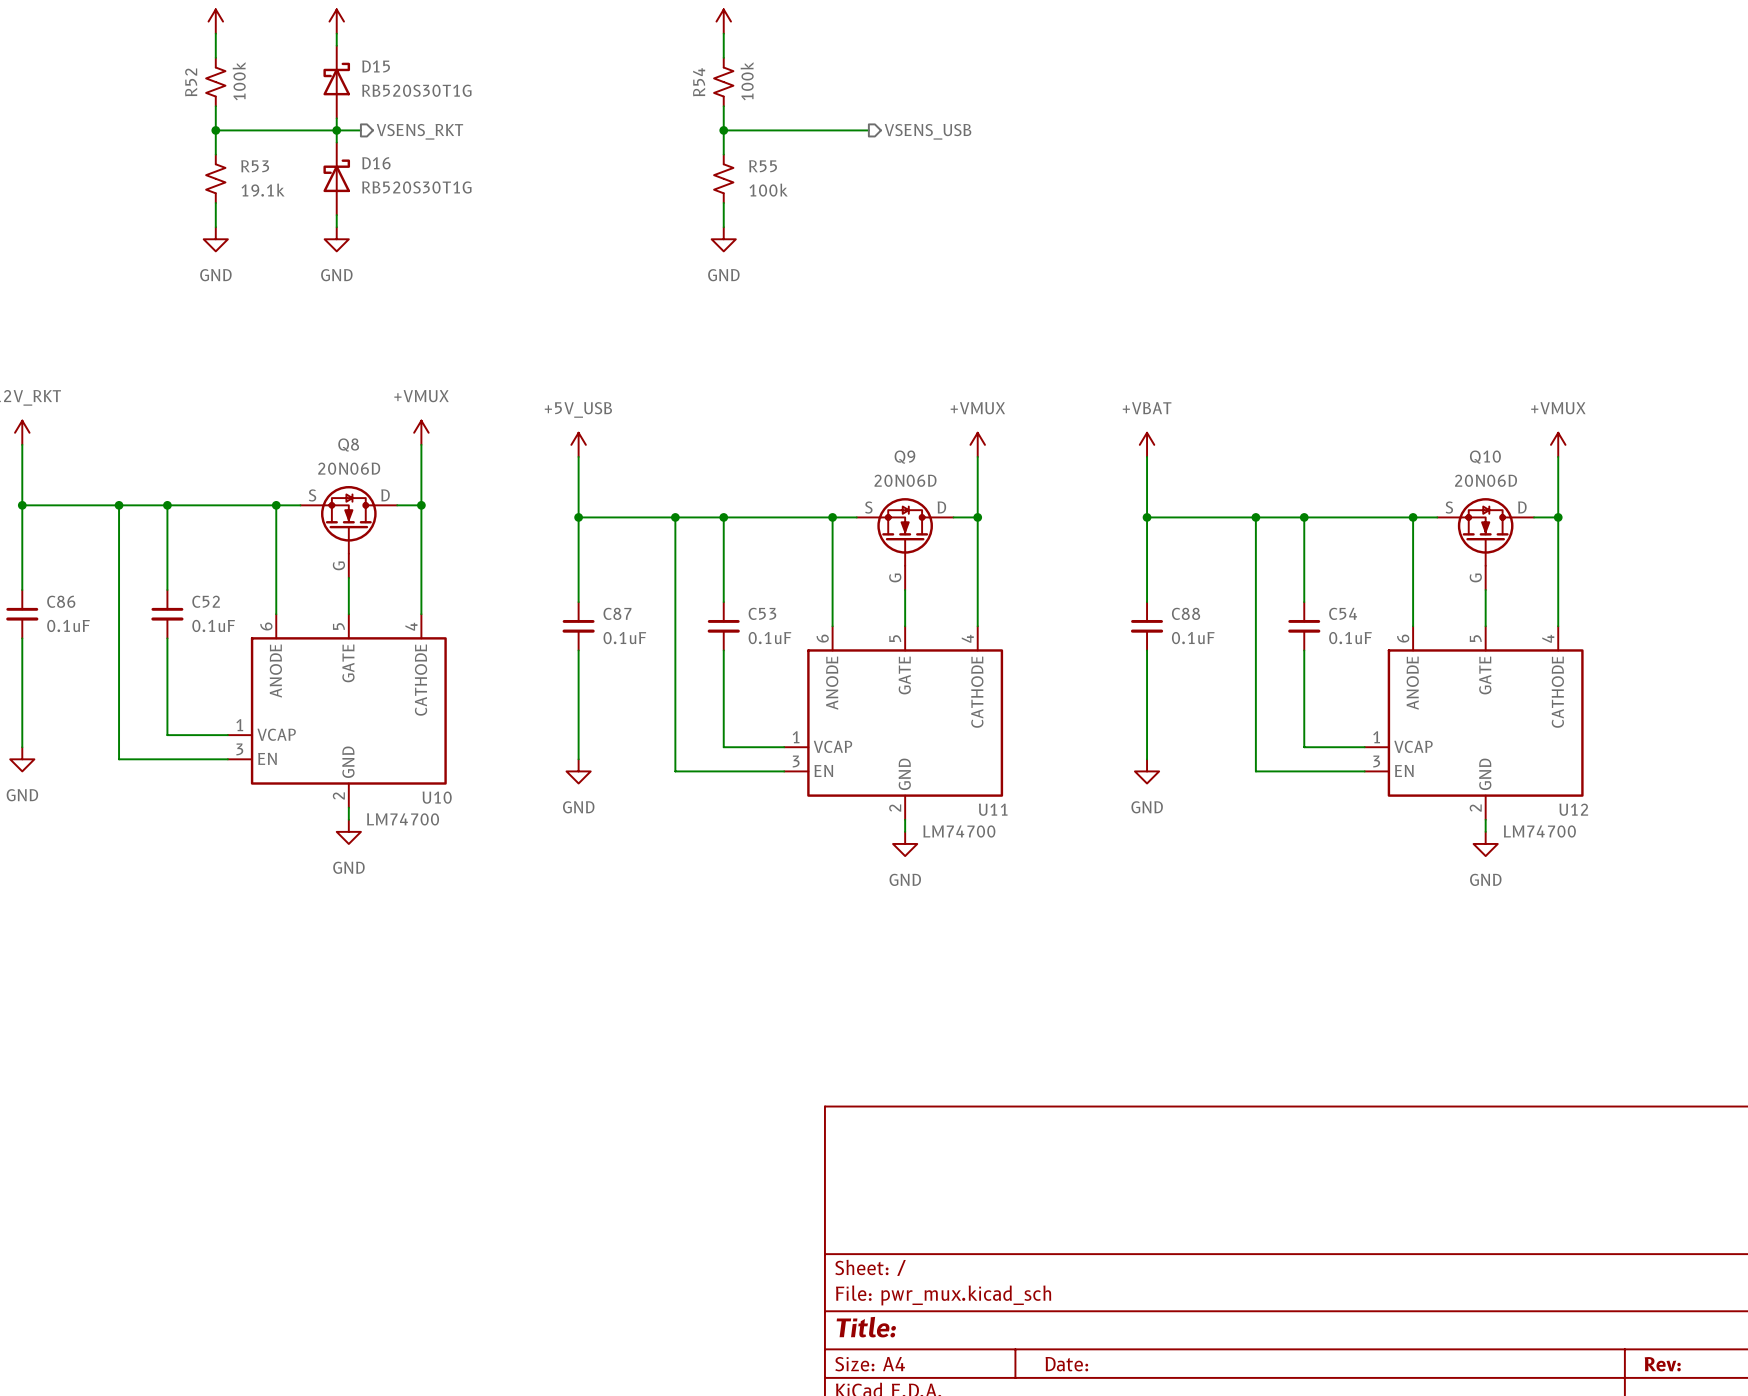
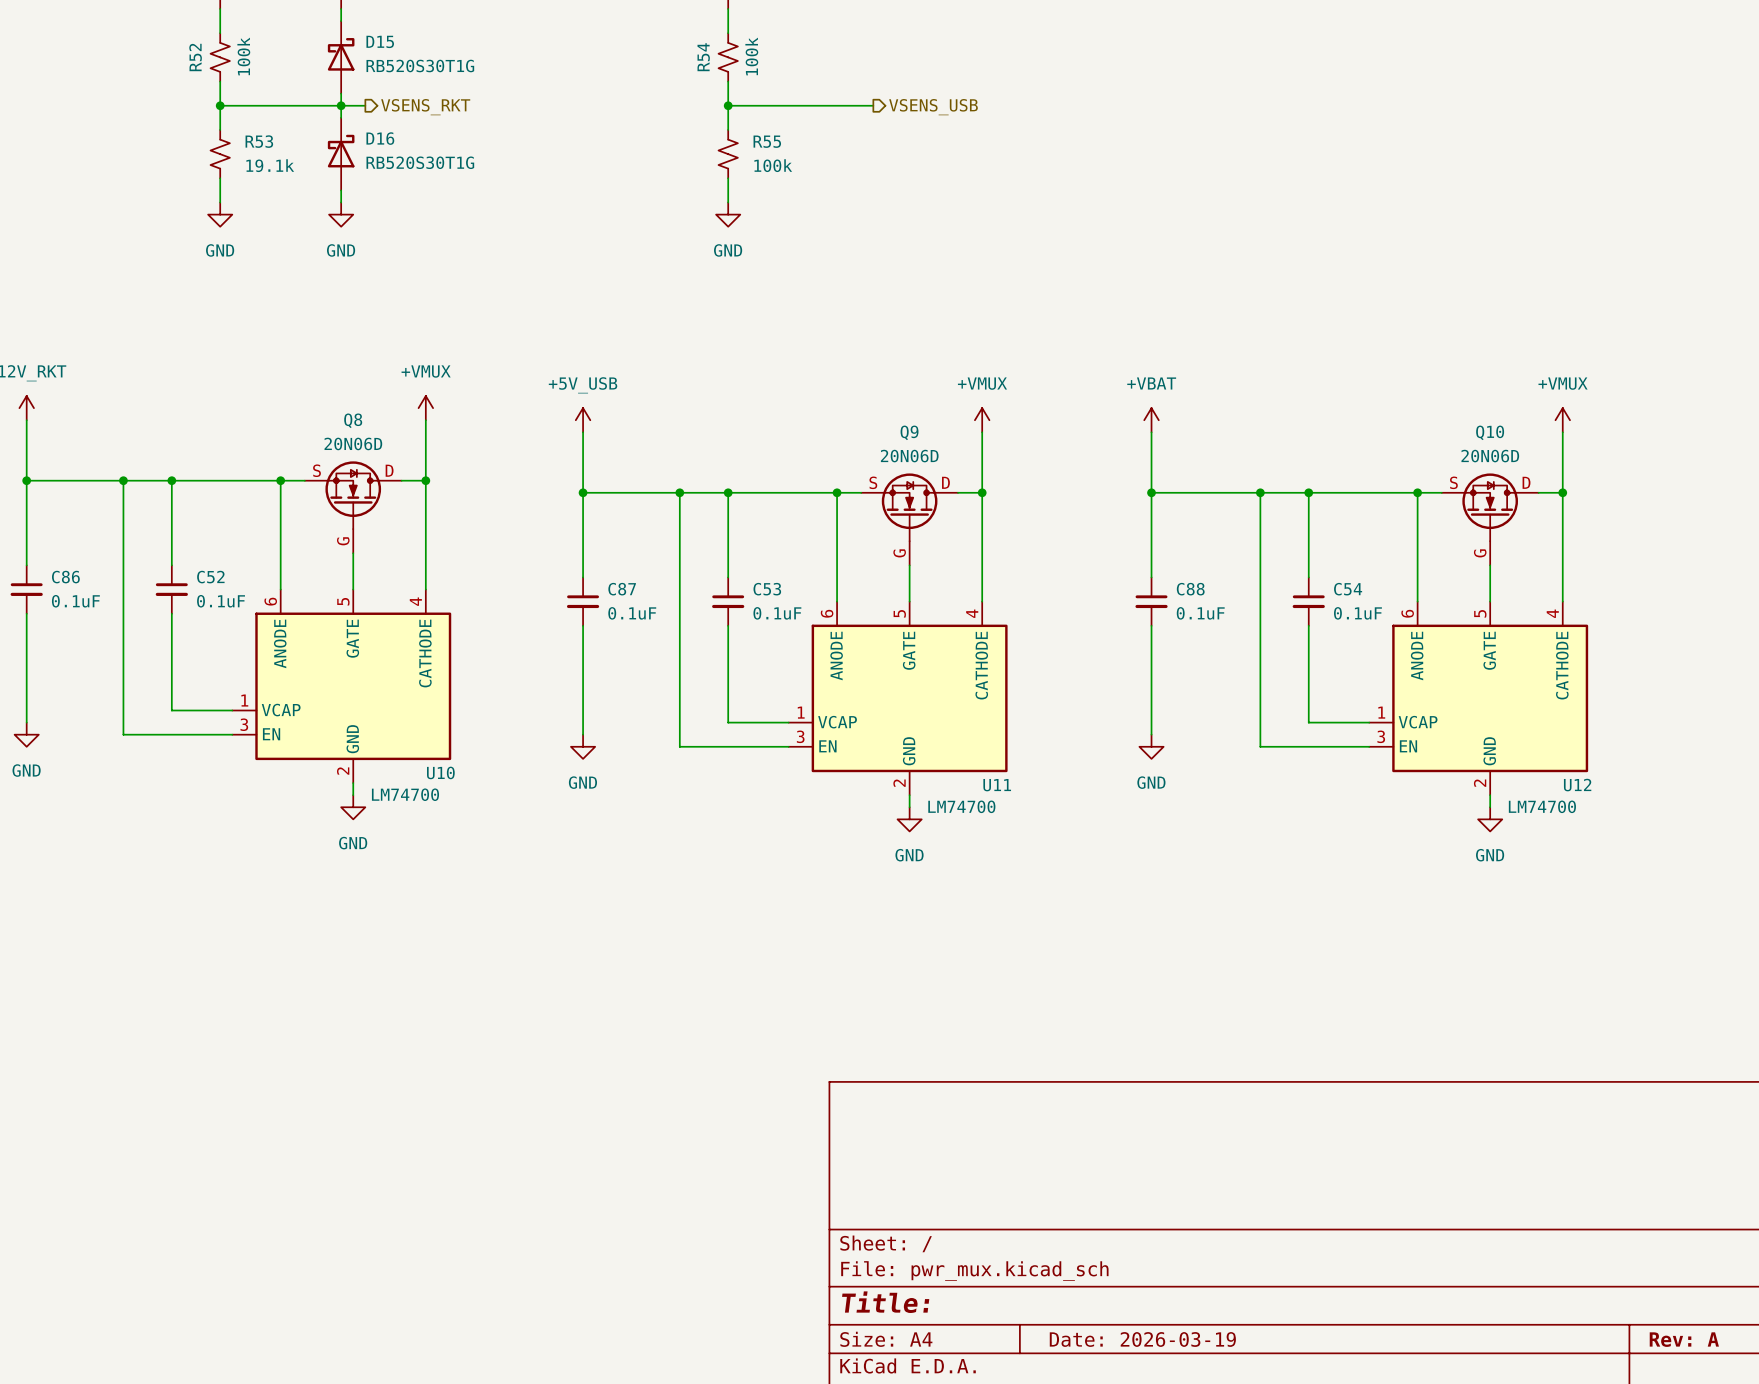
title block: Date: (1066, 1364) -> Date: 2026-03-19 (1142, 1339)
title block: Rev: (1662, 1364) -> Rev: A (1684, 1339)

